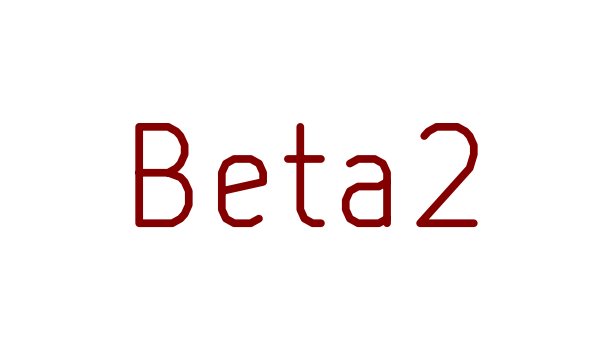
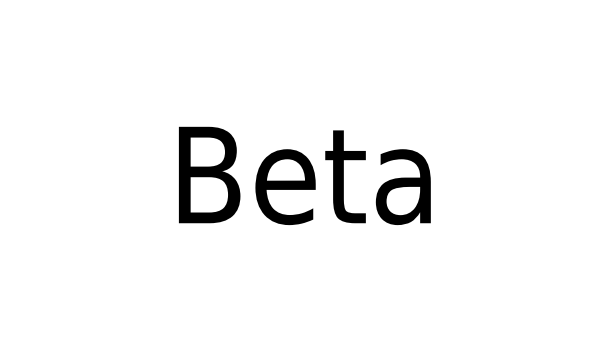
text: Beta2 (306, 175) -> Beta (304, 175)

